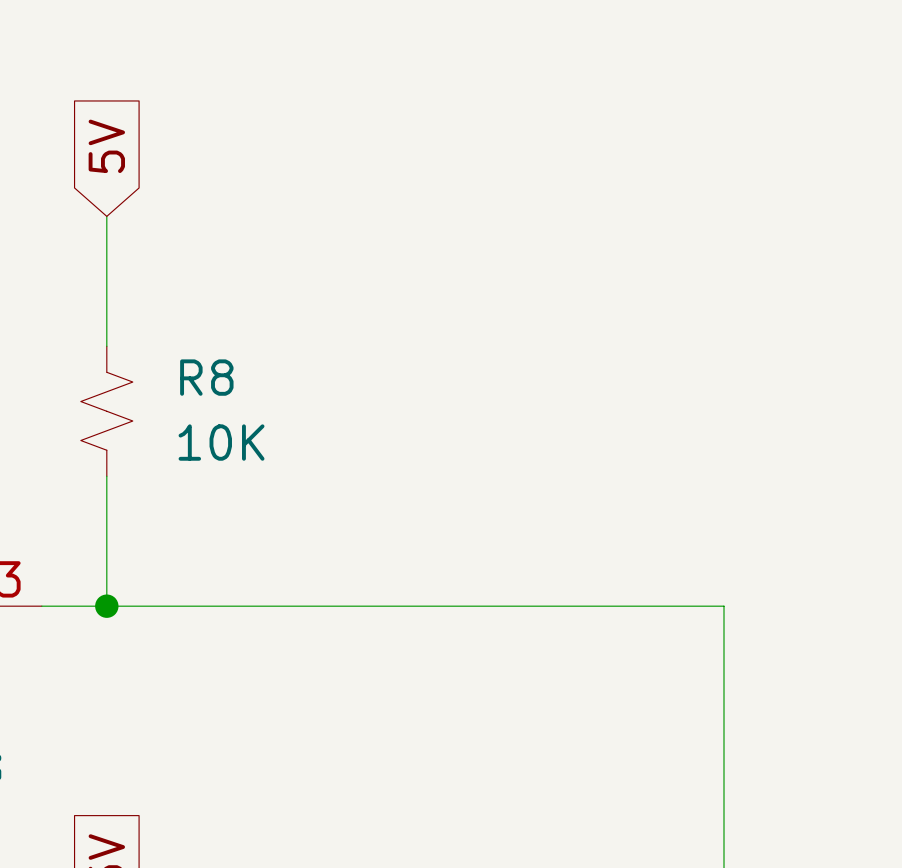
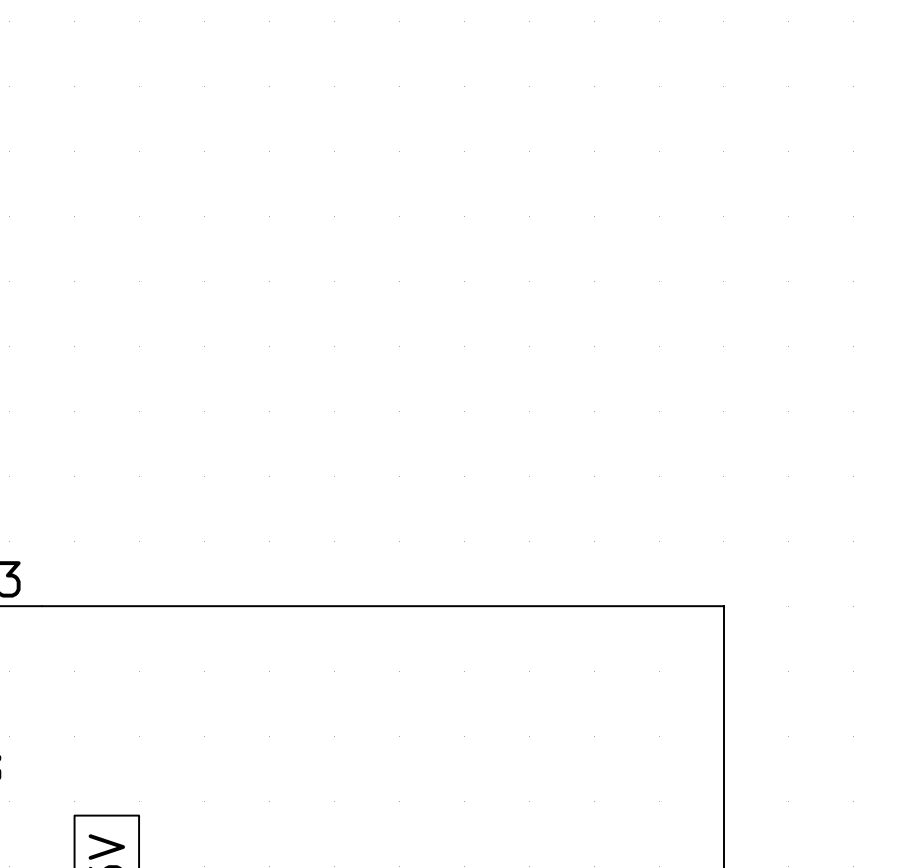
global label: 5V (106, 146) -> none
wire: (106, 216) (106, 346) -> none
R8: 10K (106, 411) -> none
wire: (106, 476) (106, 606) -> none
junction: (106, 606) -> none

